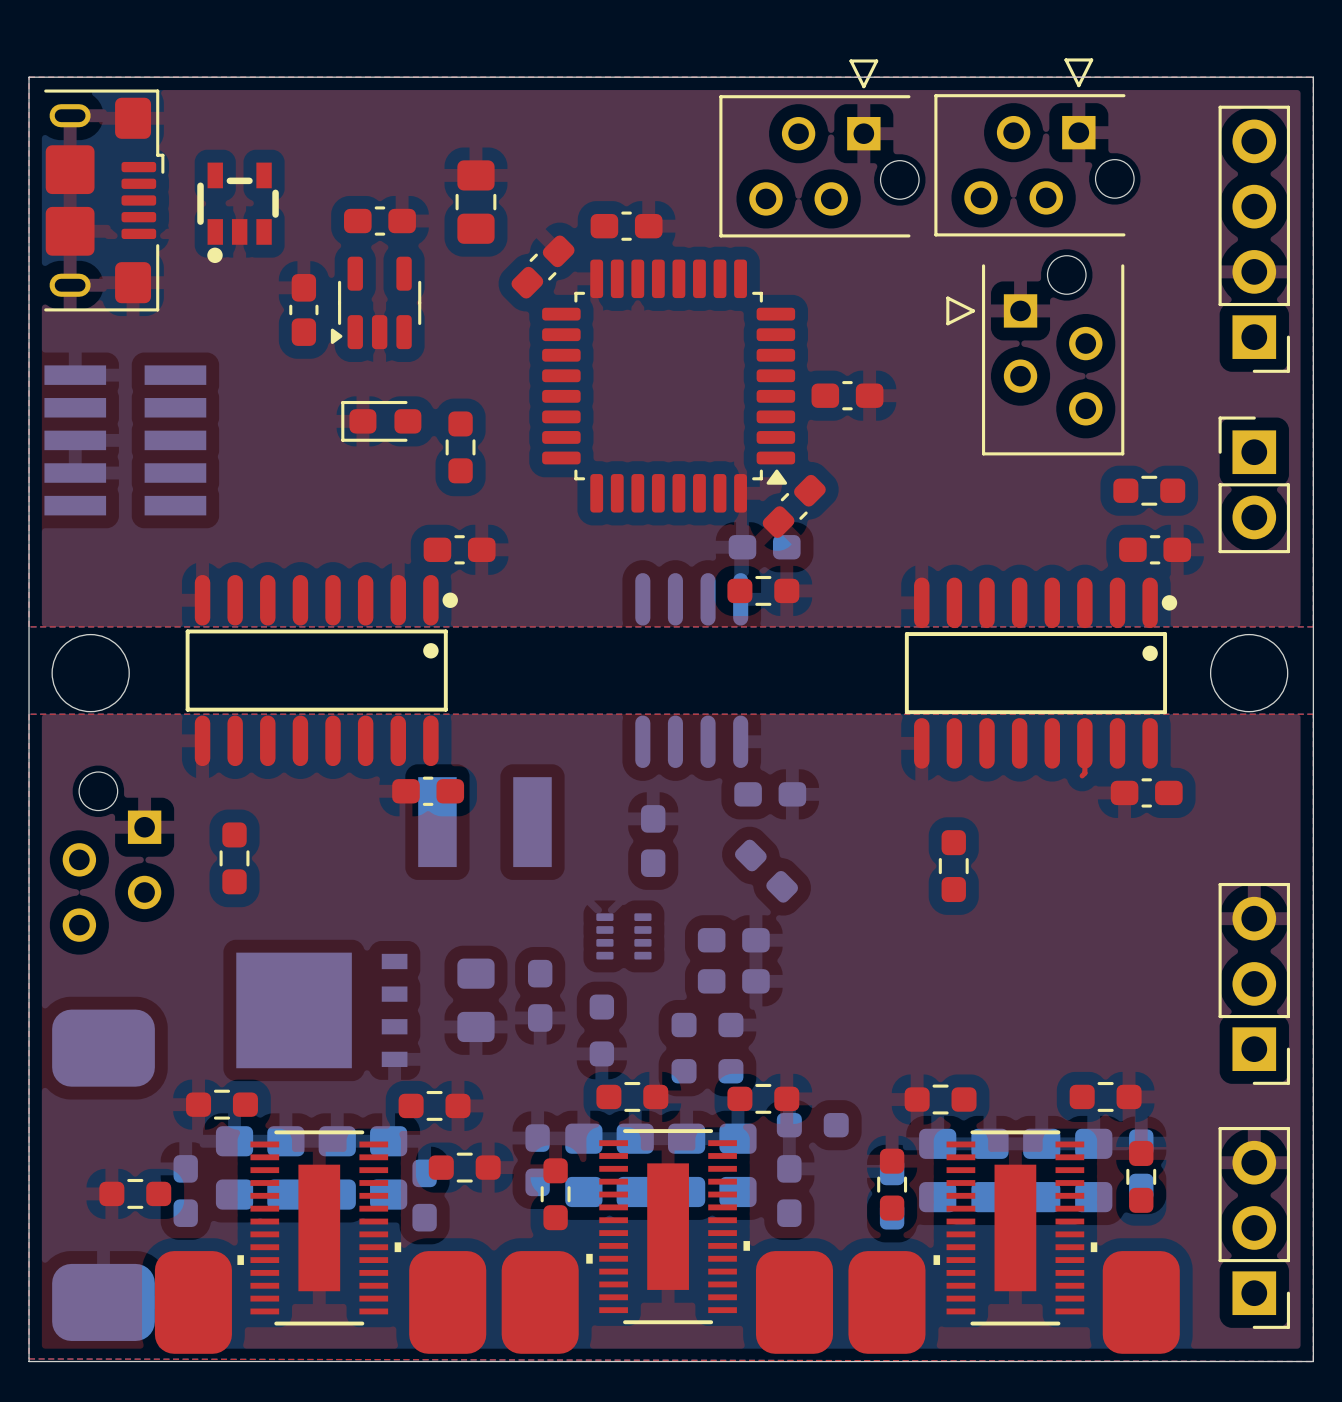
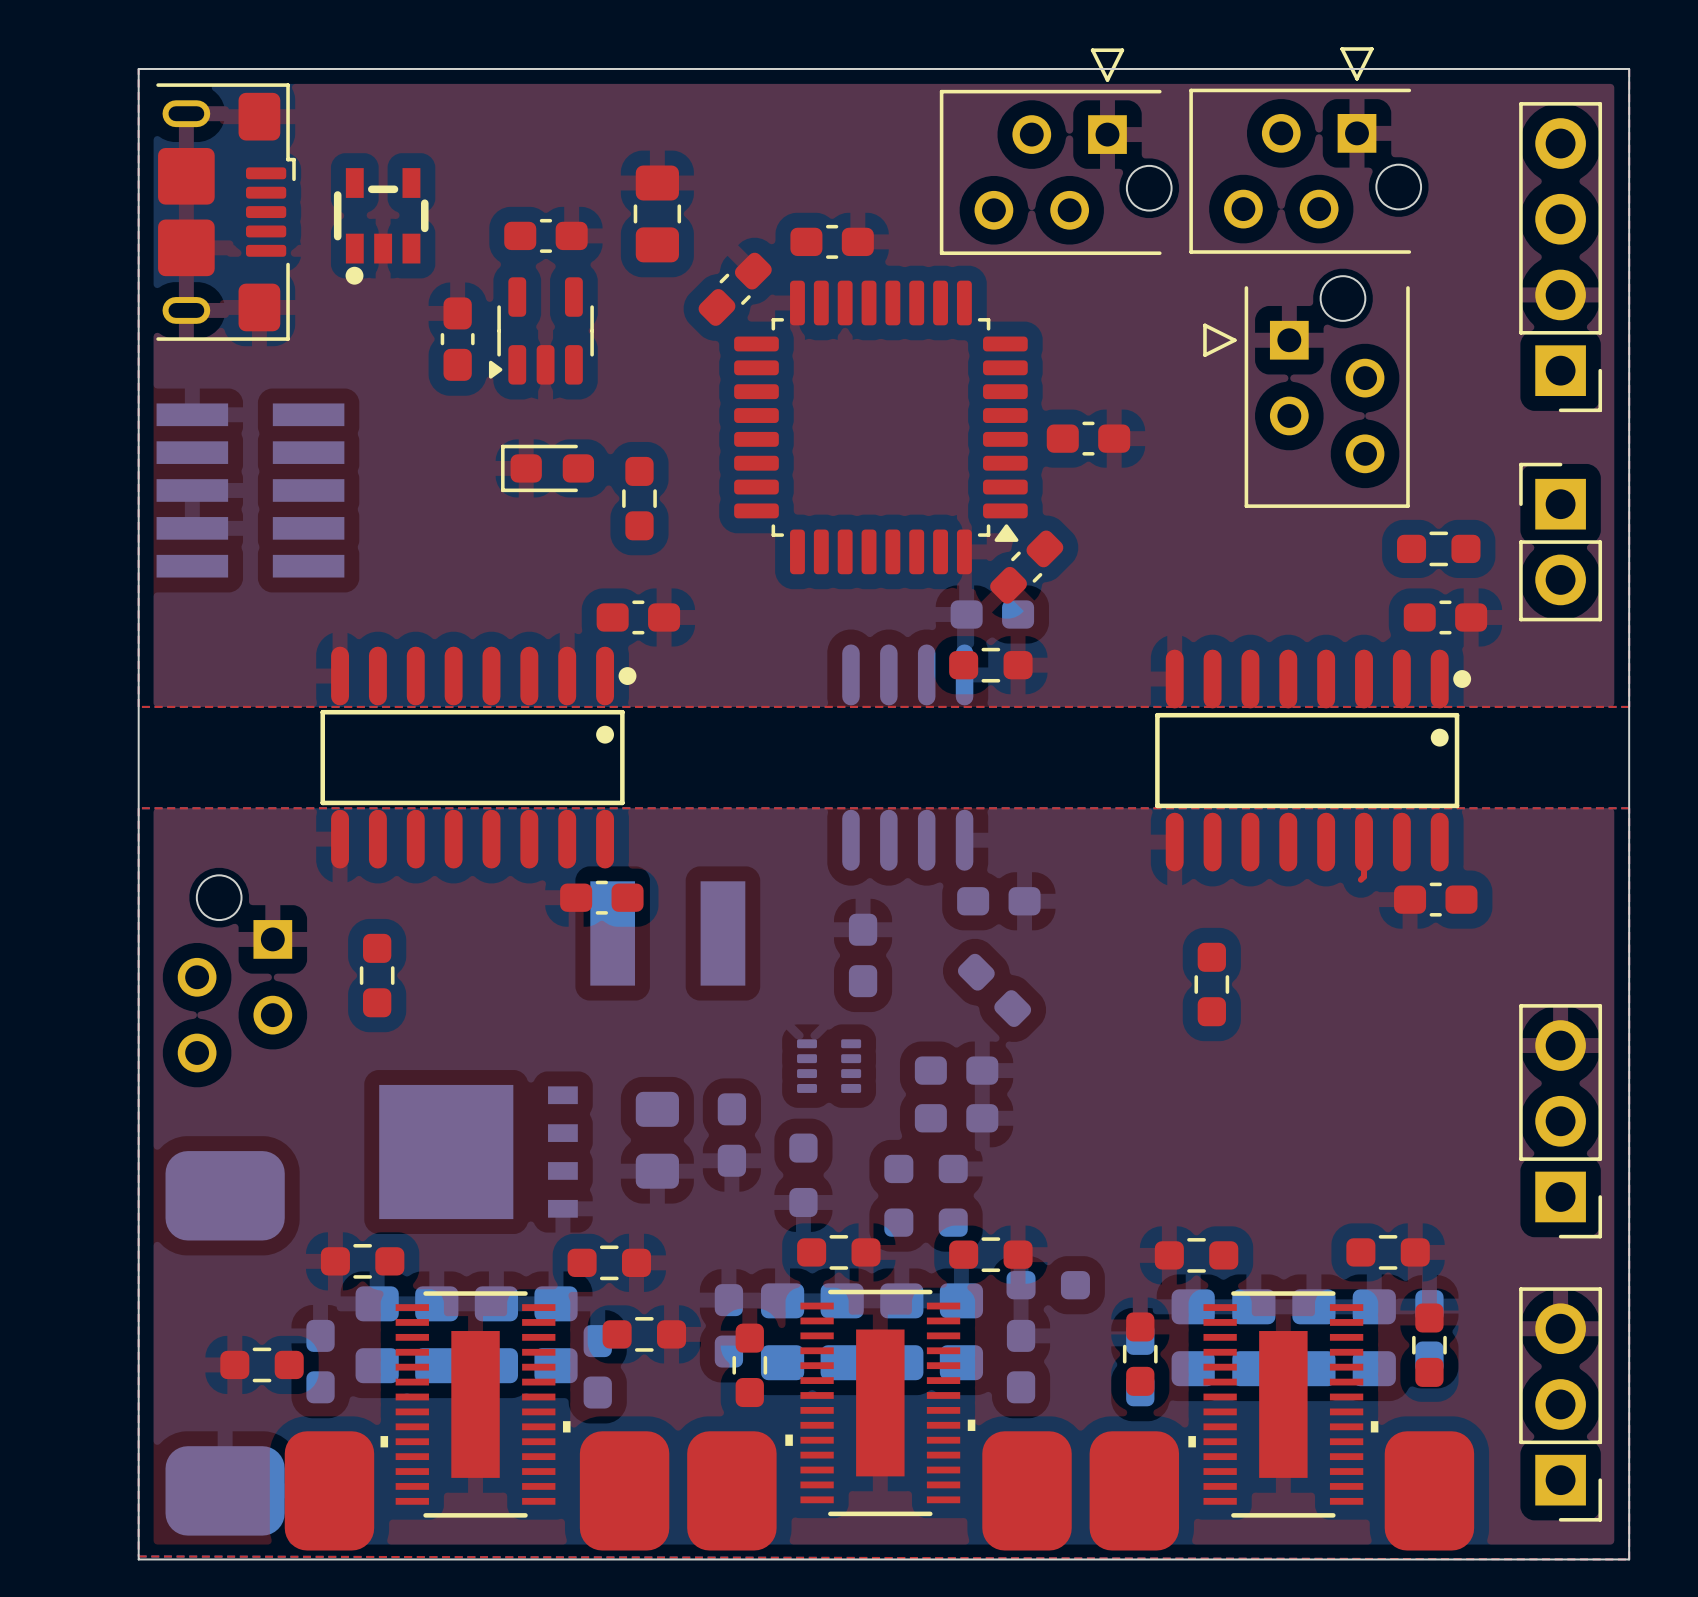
round board edge: [51, 633, 130, 713] -> none
round board edge: [1209, 633, 1289, 713] -> none

